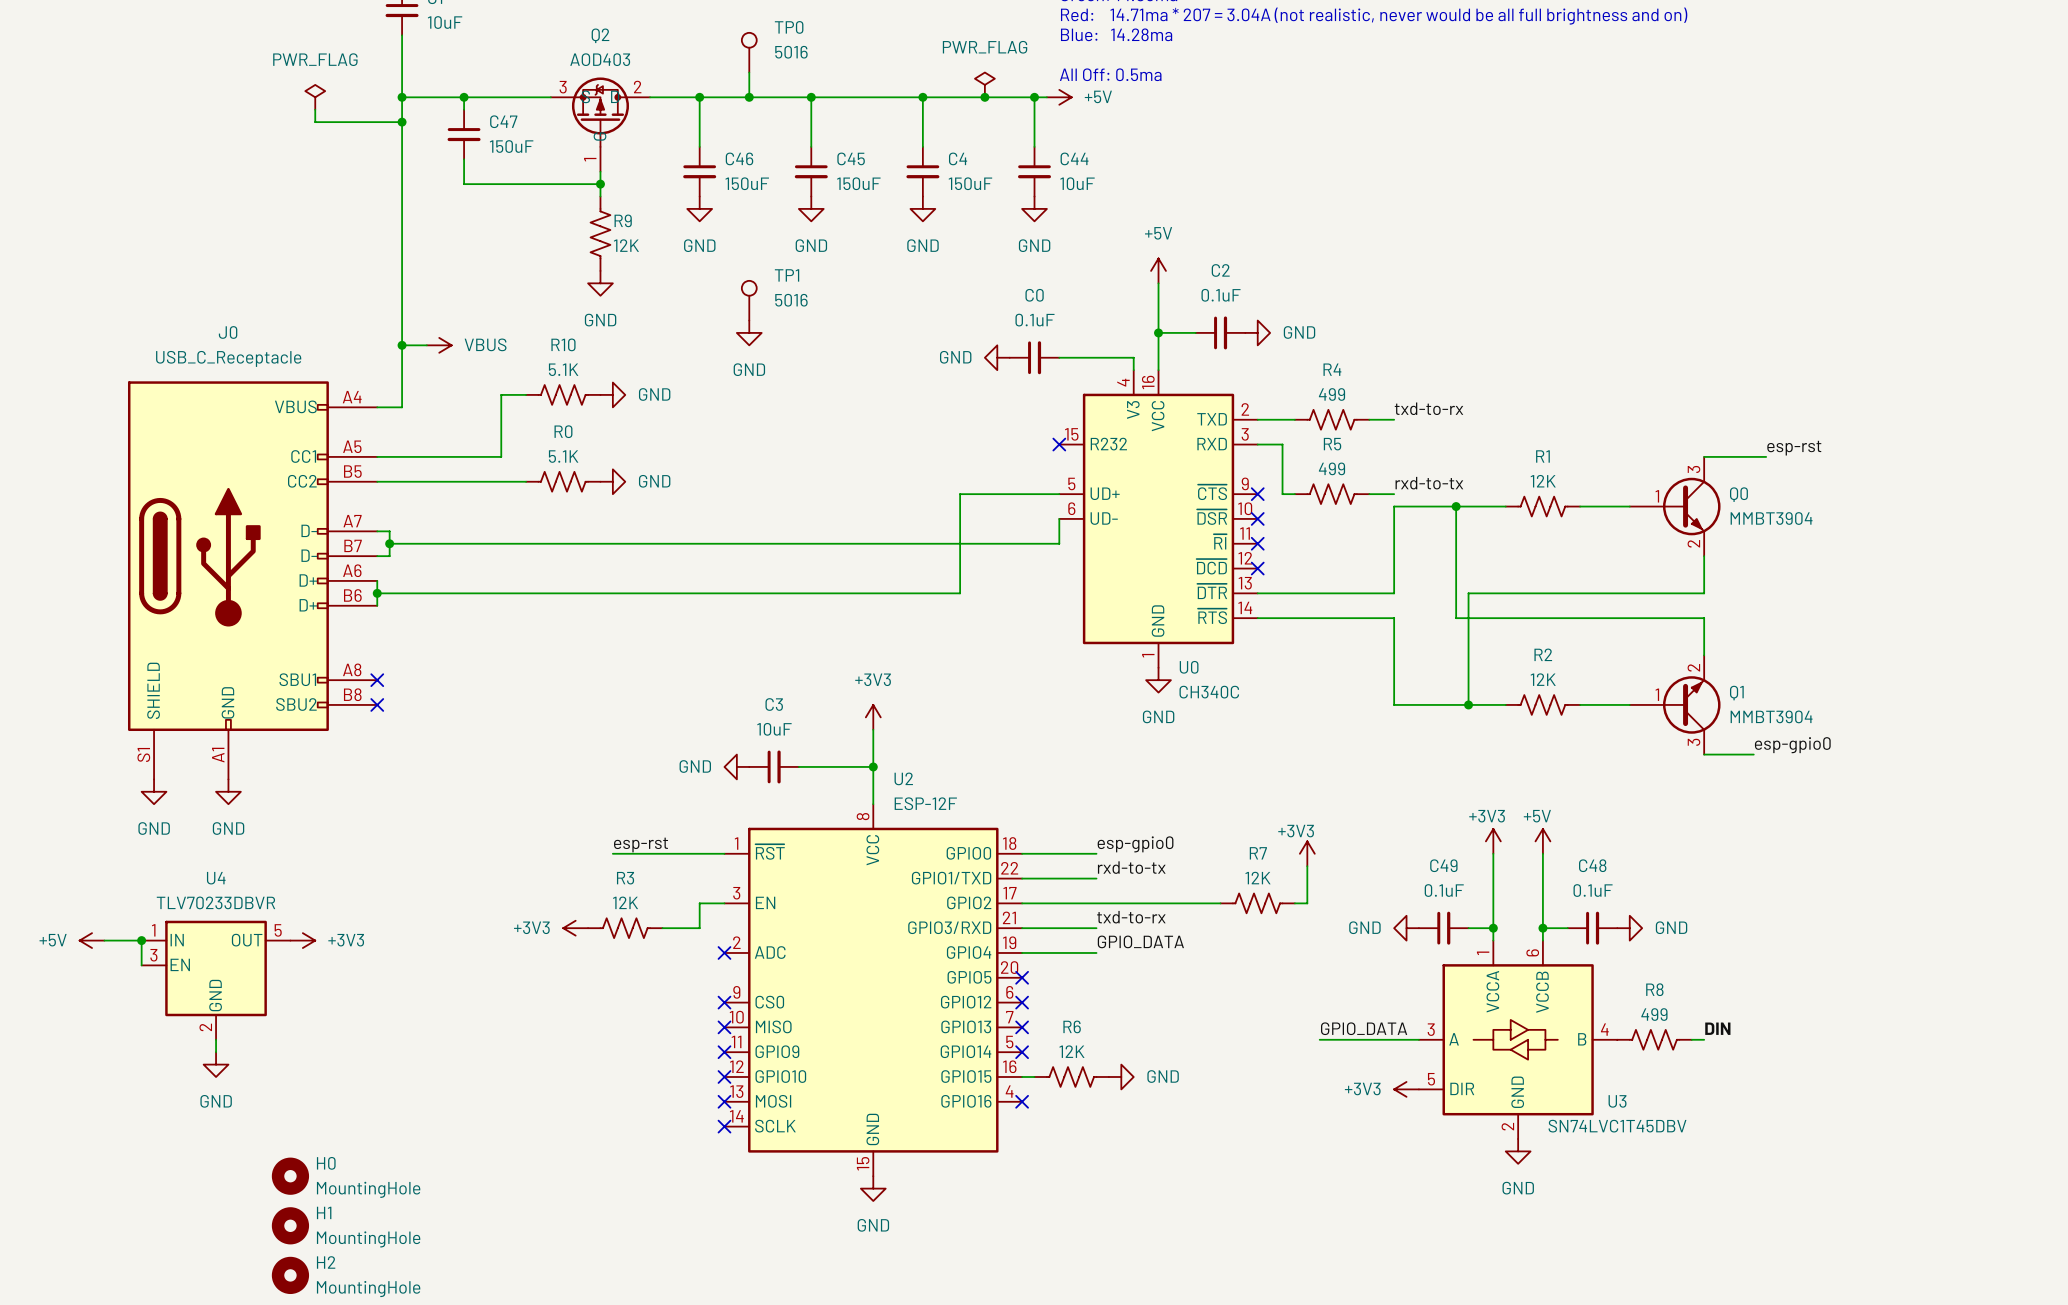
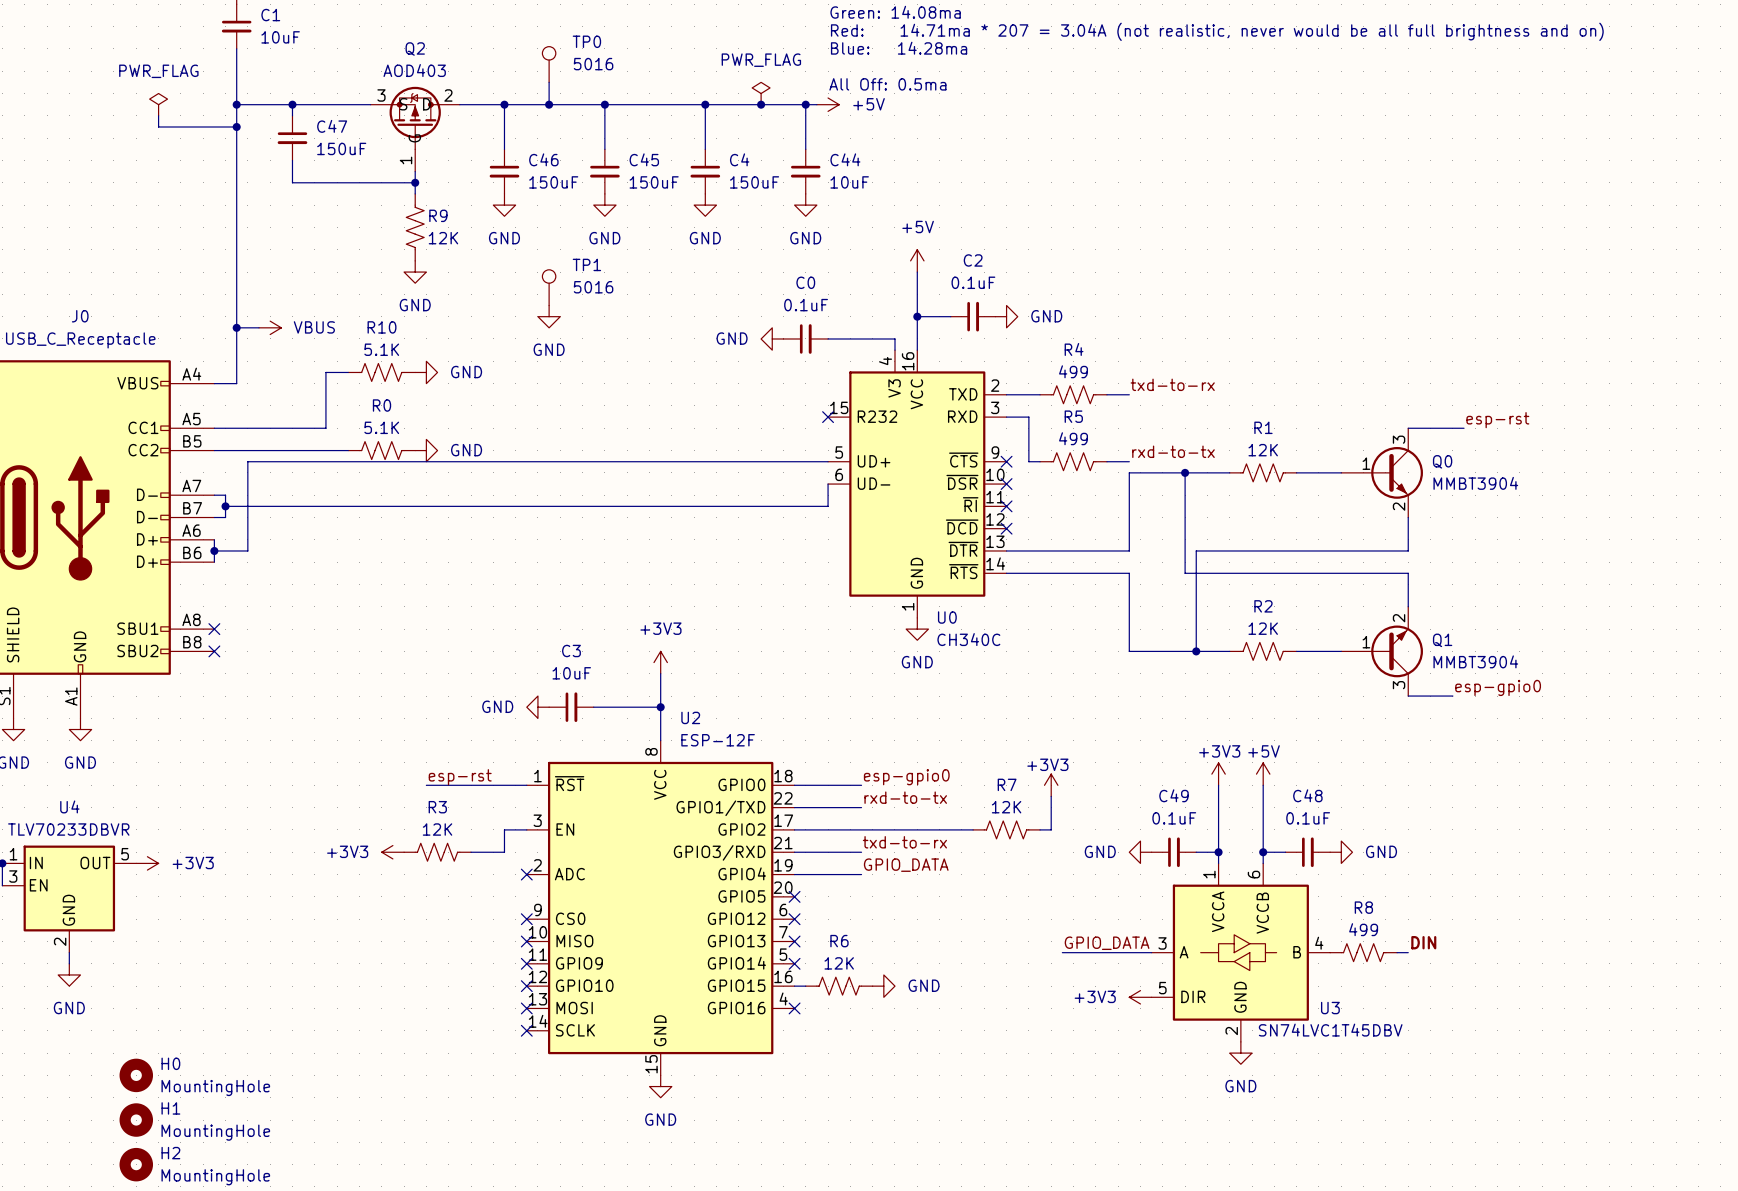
wire: (960, 494) (960, 593) (414, 593) -> (738, 461) (247, 461) (247, 550)

